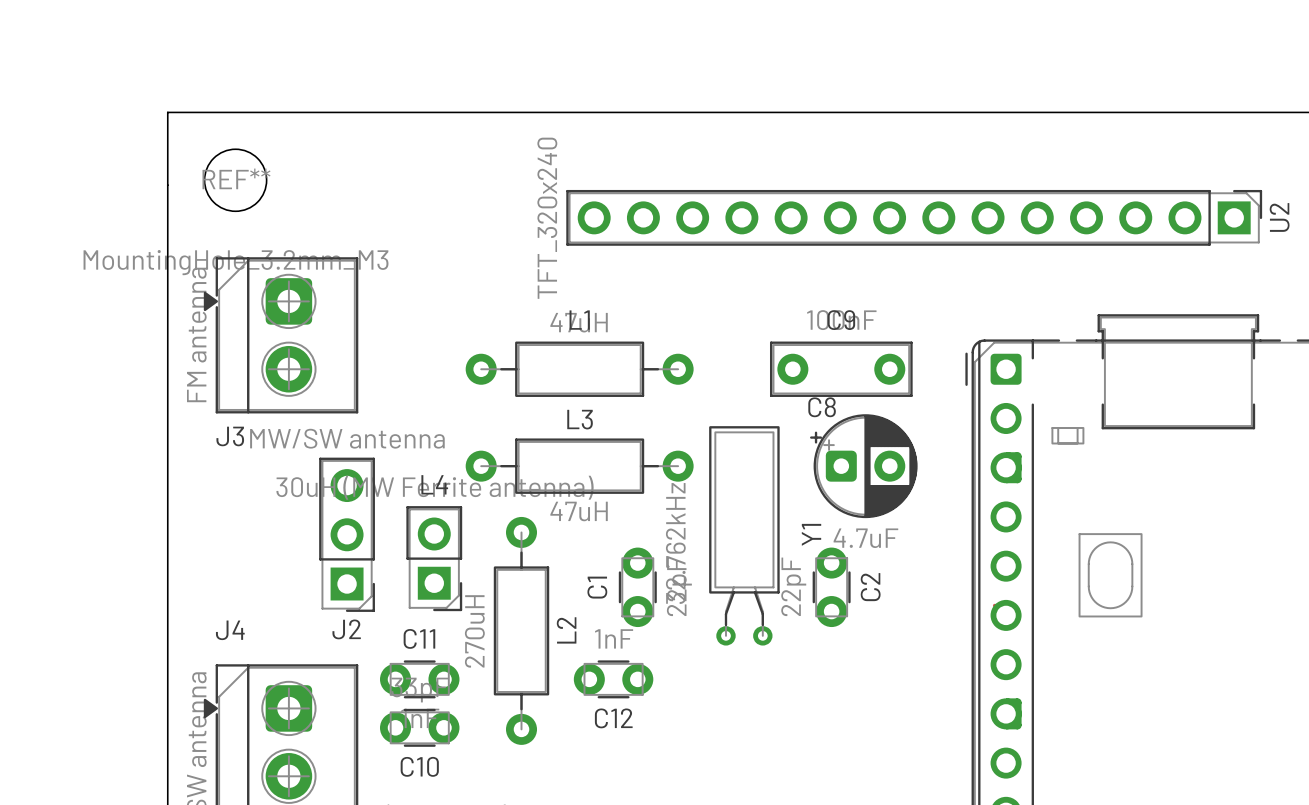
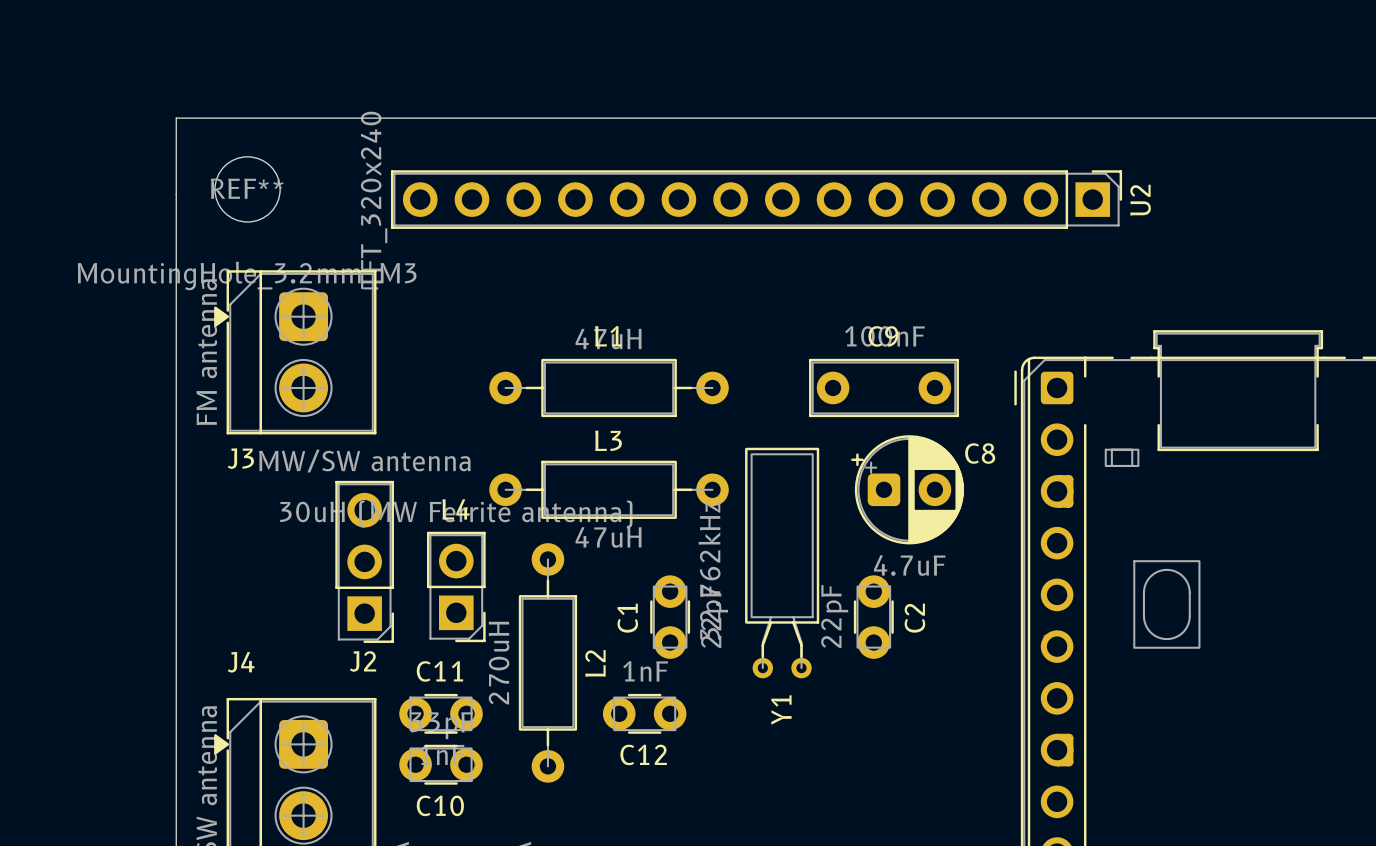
U2 position: (914, 217) -> (756, 199)
C8 name position: C8 (822, 407) -> C8 (980, 453)
Y1 name position: Y1 (811, 534) -> Y1 (781, 710)

